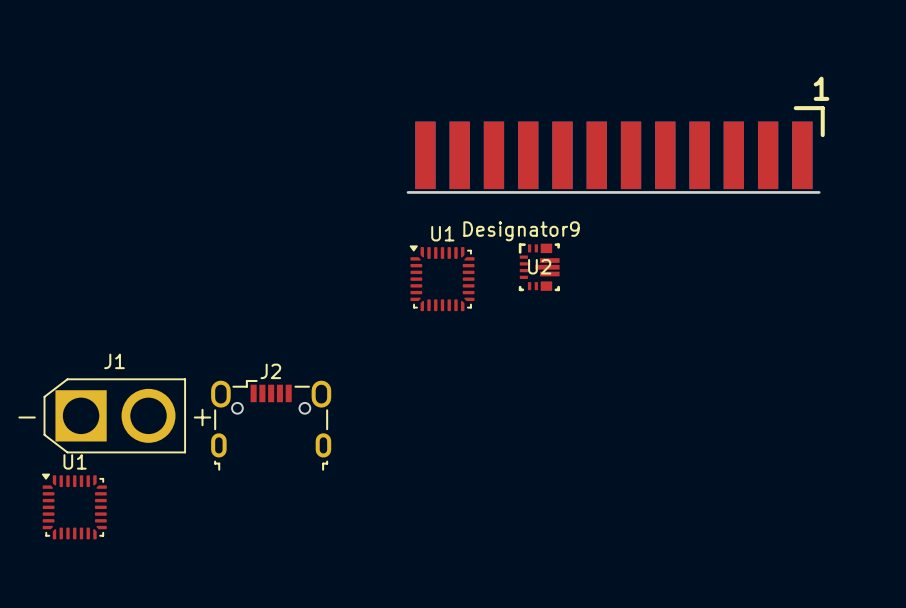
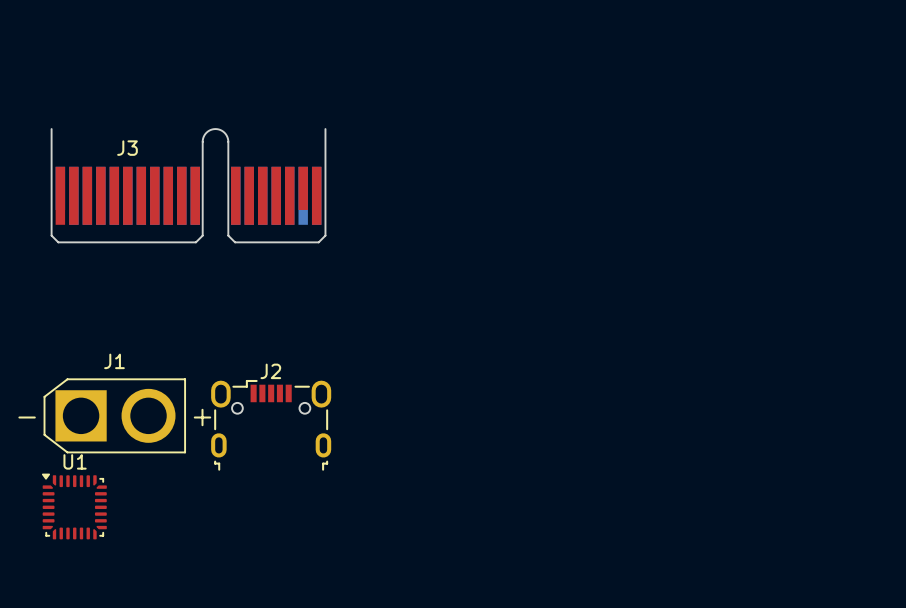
part: (615, 149) -> none
J3: none -> (188, 185)
U2: (539, 267) -> none
U1: (442, 278) -> none

